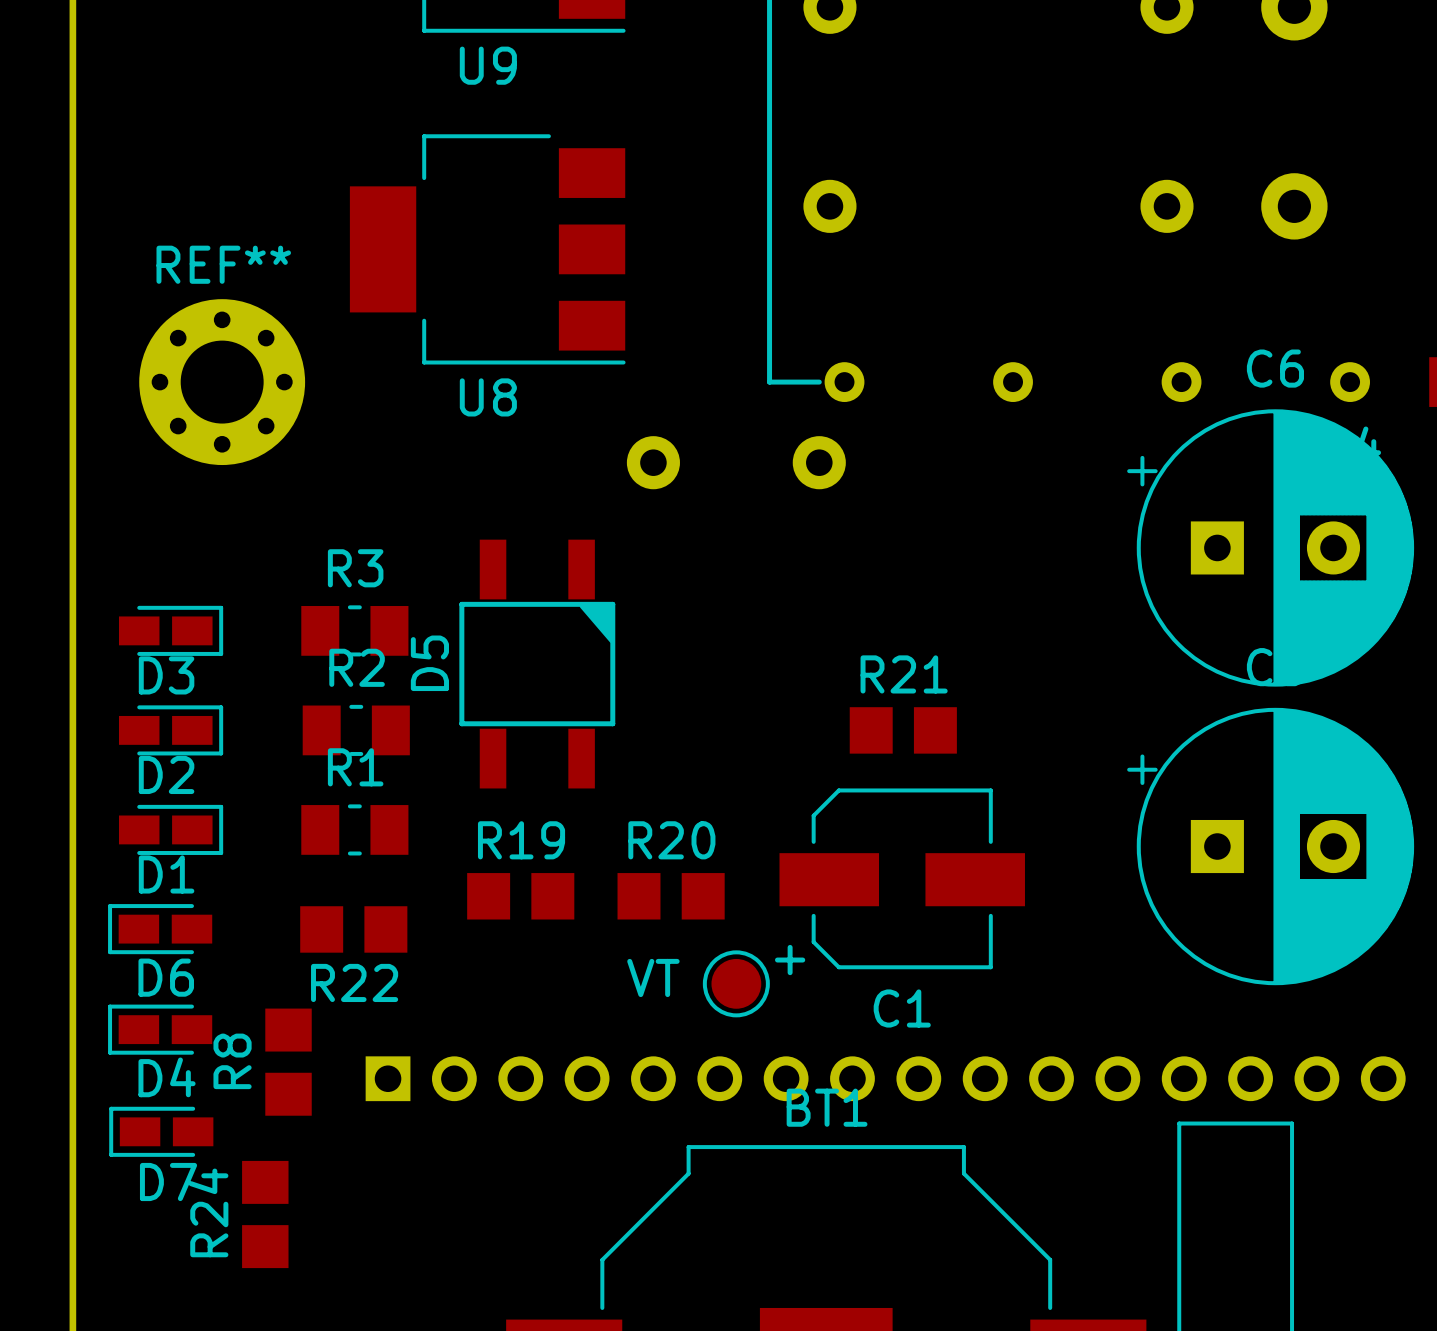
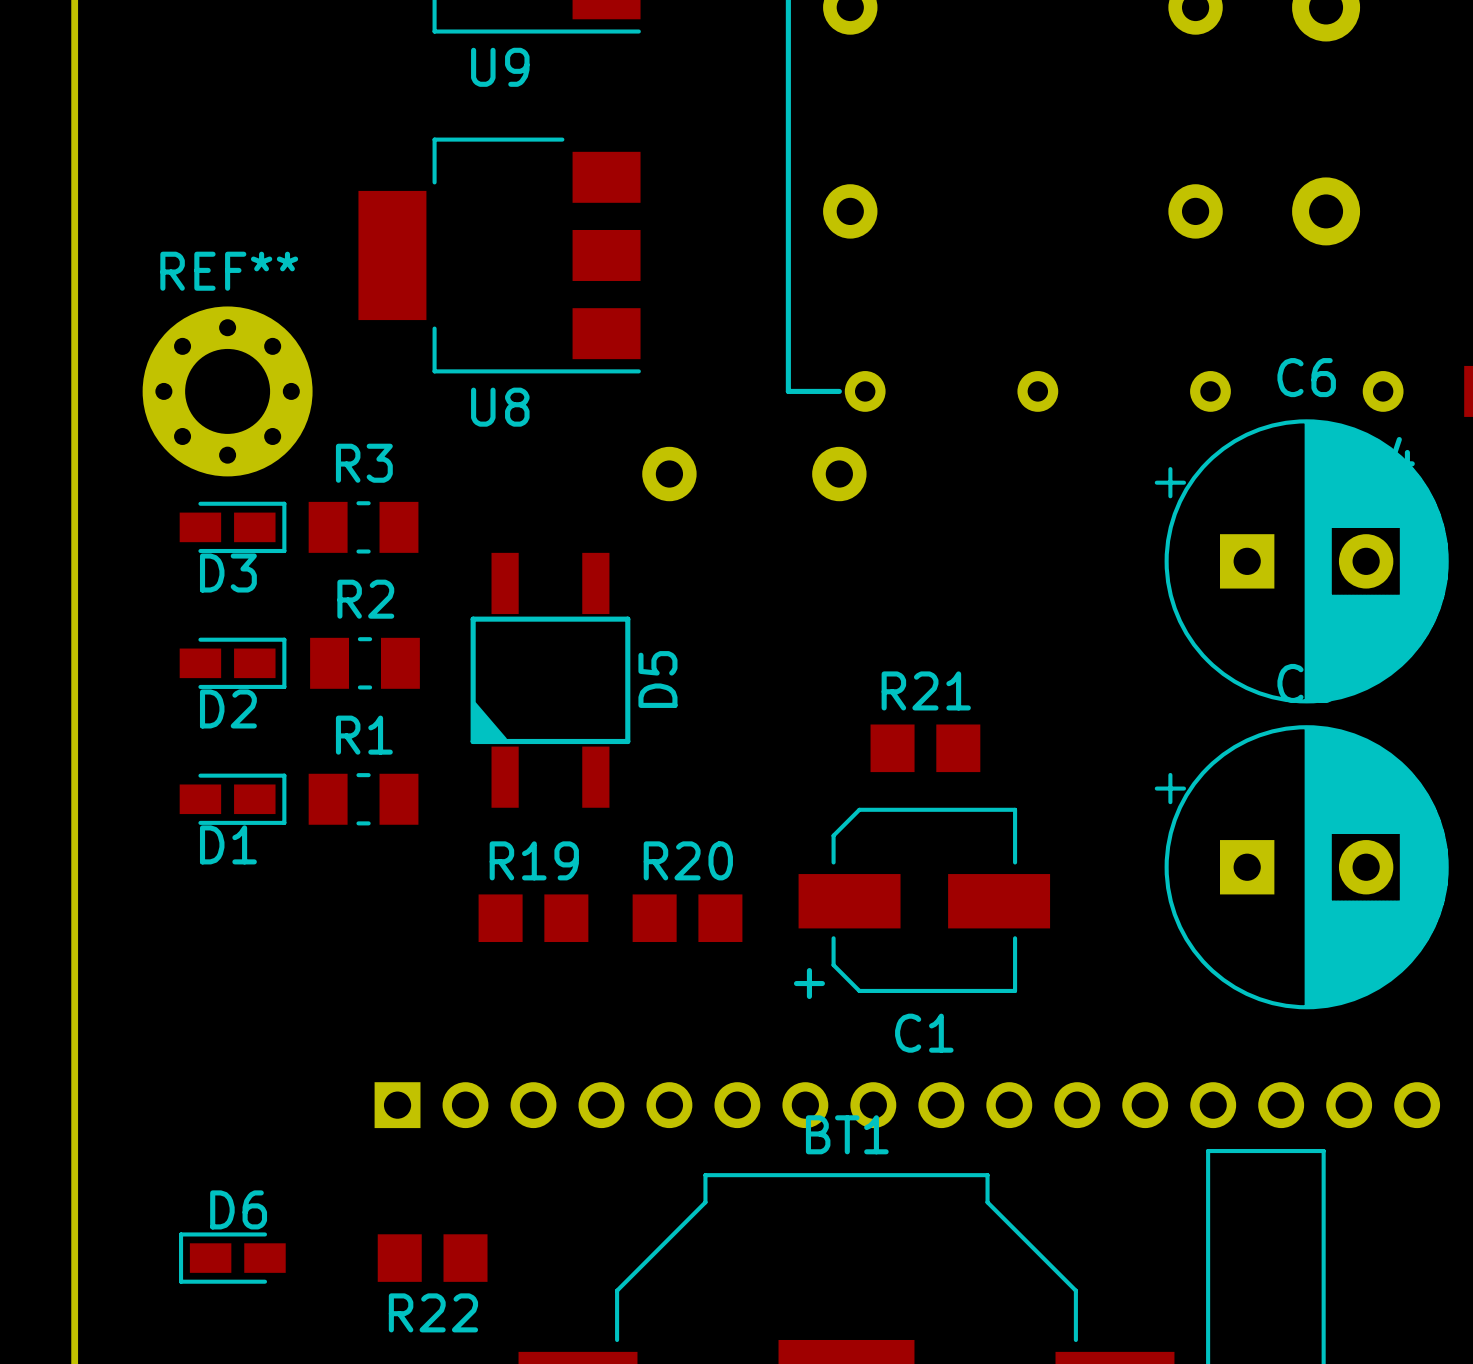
D3 position: (171, 630) -> (233, 527)
R3 position: (354, 630) -> (363, 527)
D5 rotation: 0° (537, 664) -> 180° (550, 680)
D2 position: (171, 730) -> (233, 663)
R2 position: (356, 730) -> (364, 663)
D1 position: (171, 829) -> (233, 799)
R1 position: (354, 829) -> (363, 799)
D6 position: (160, 929) -> (232, 1258)
R22 position: (353, 929) -> (432, 1258)
D6 name position: D6 (166, 977) -> D6 (238, 1209)
VT: (736, 983) -> none
D4: (160, 1029) -> none
R8: (288, 1062) -> none
D7: (161, 1131) -> none
R24: (265, 1214) -> none

